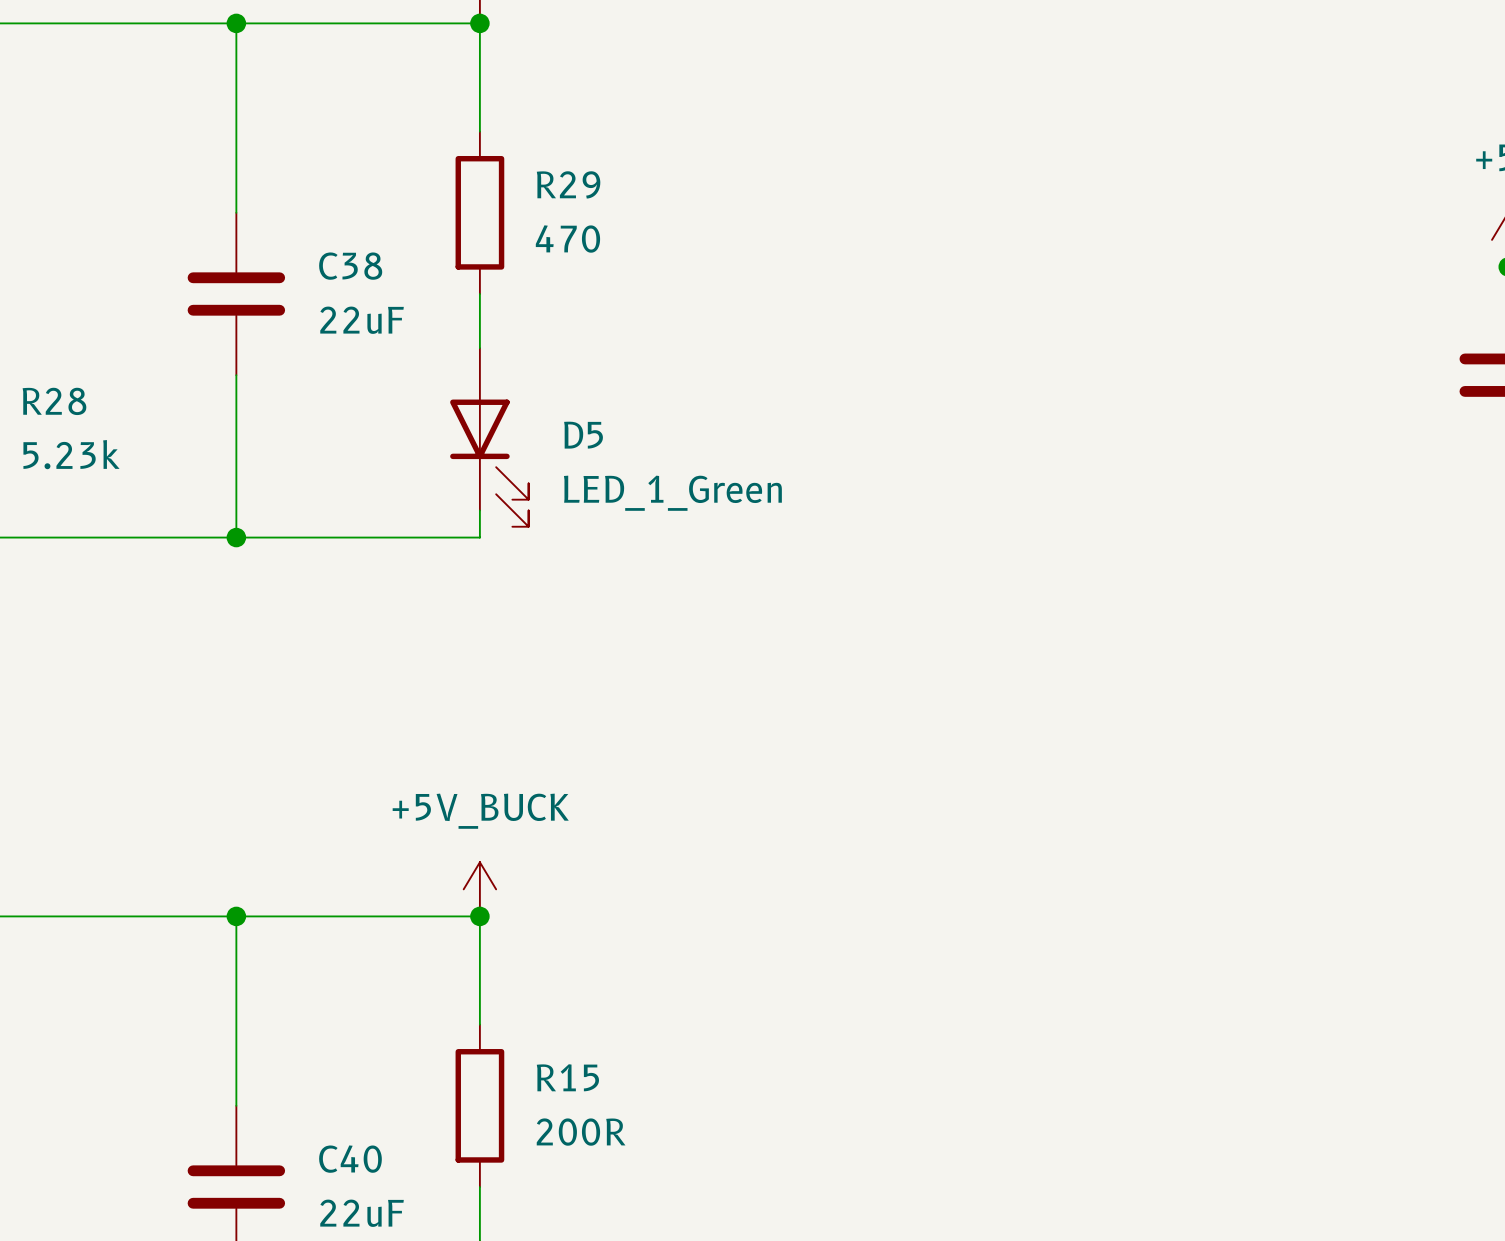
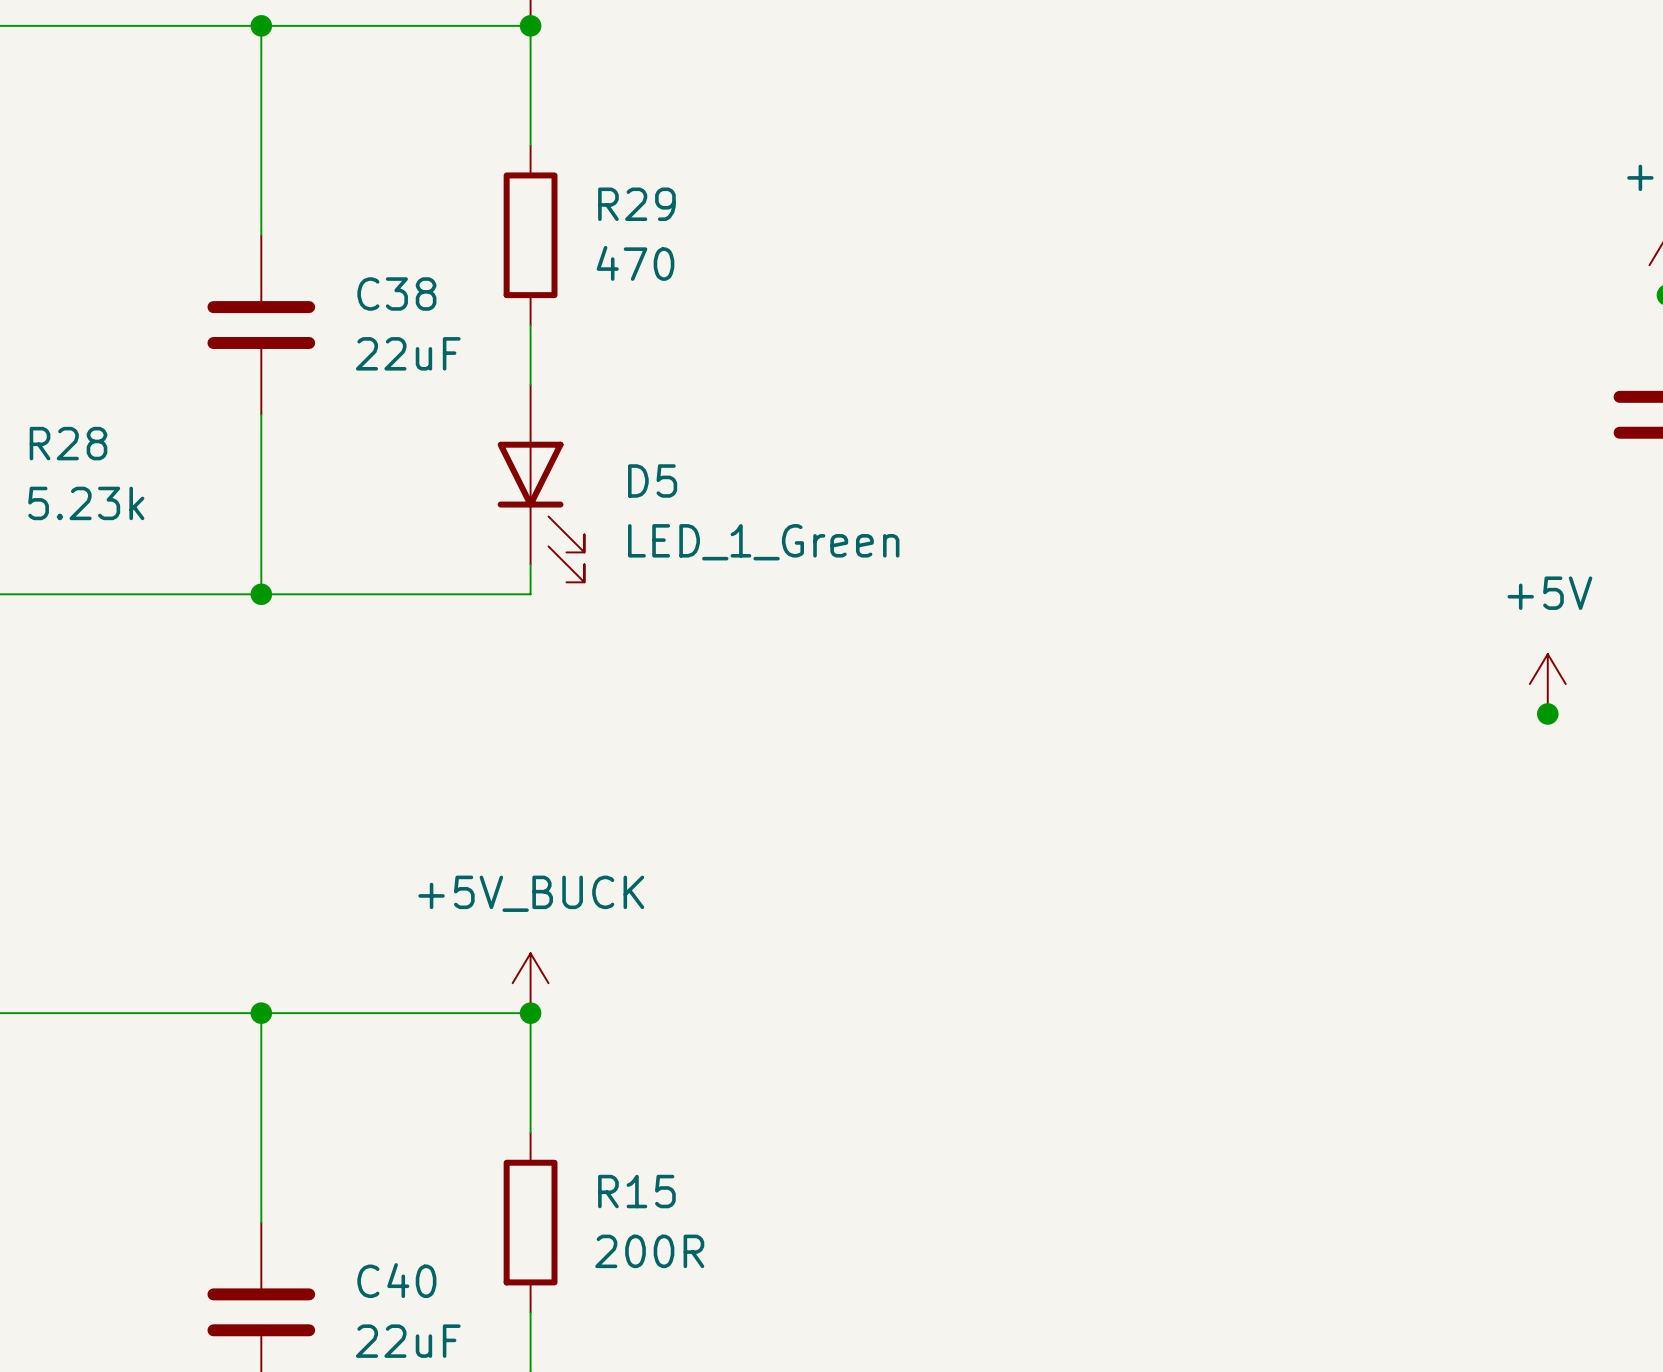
power symbol: none -> +5V (1547, 684)
junction: none -> (1547, 713)

